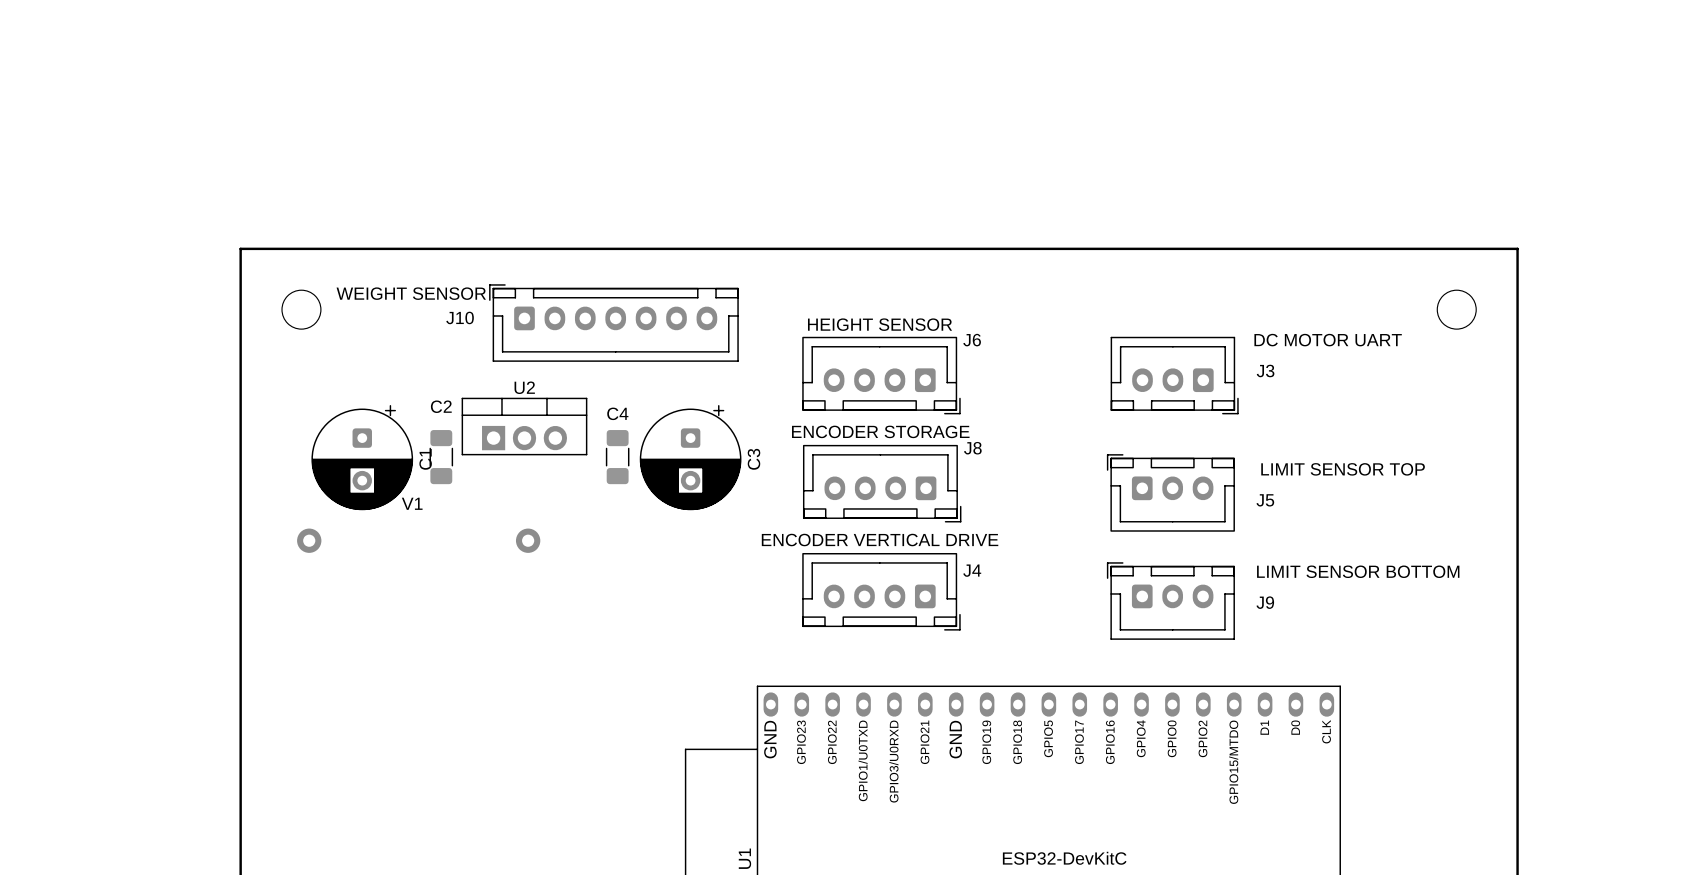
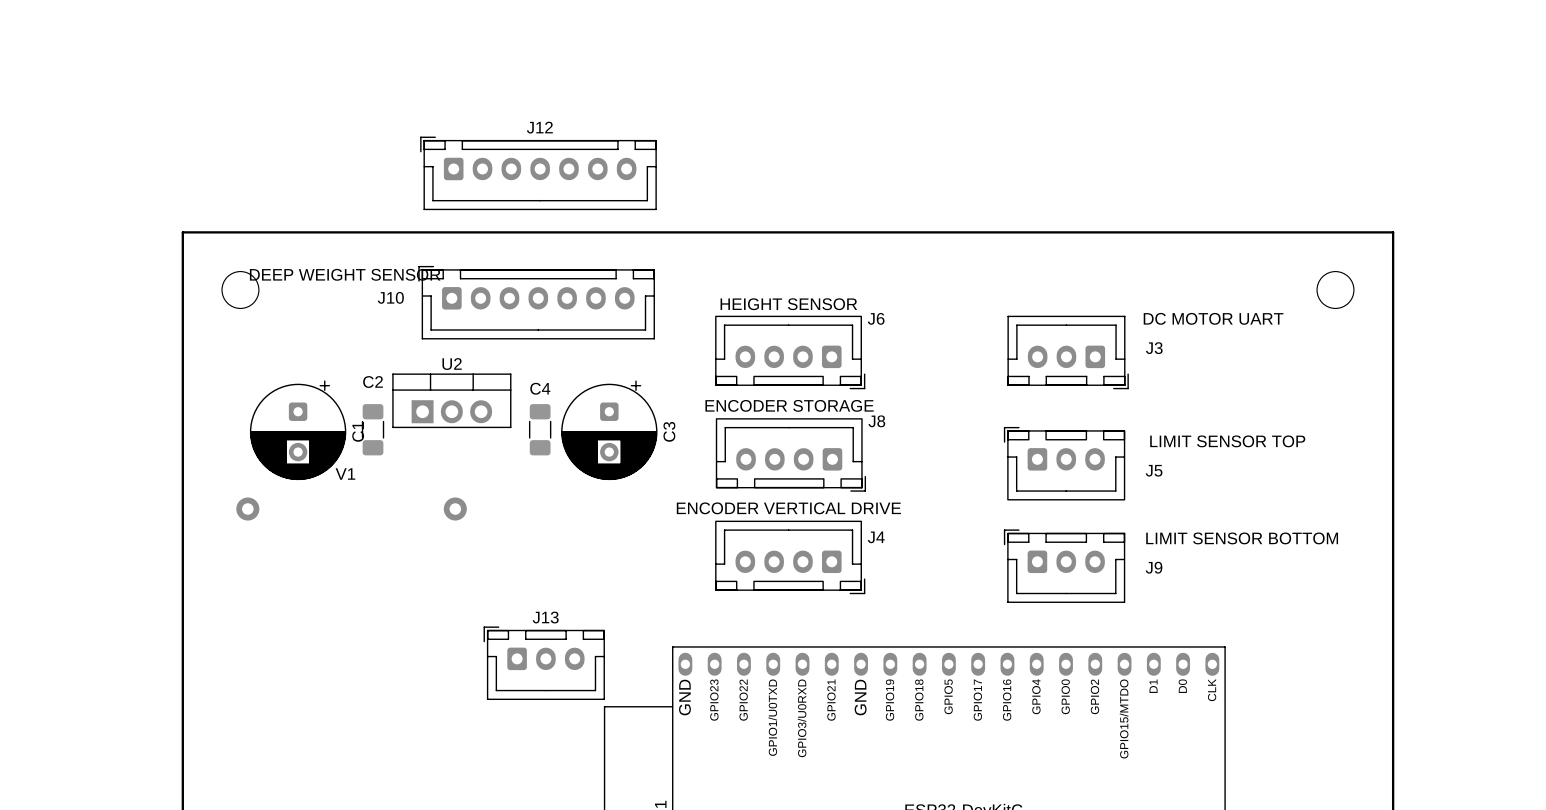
J12: none -> (538, 173)
J10 value: WEIGHT SENSOR (411, 293) -> DEEP WEIGHT SENSOR (345, 274)
J13: none -> (544, 663)

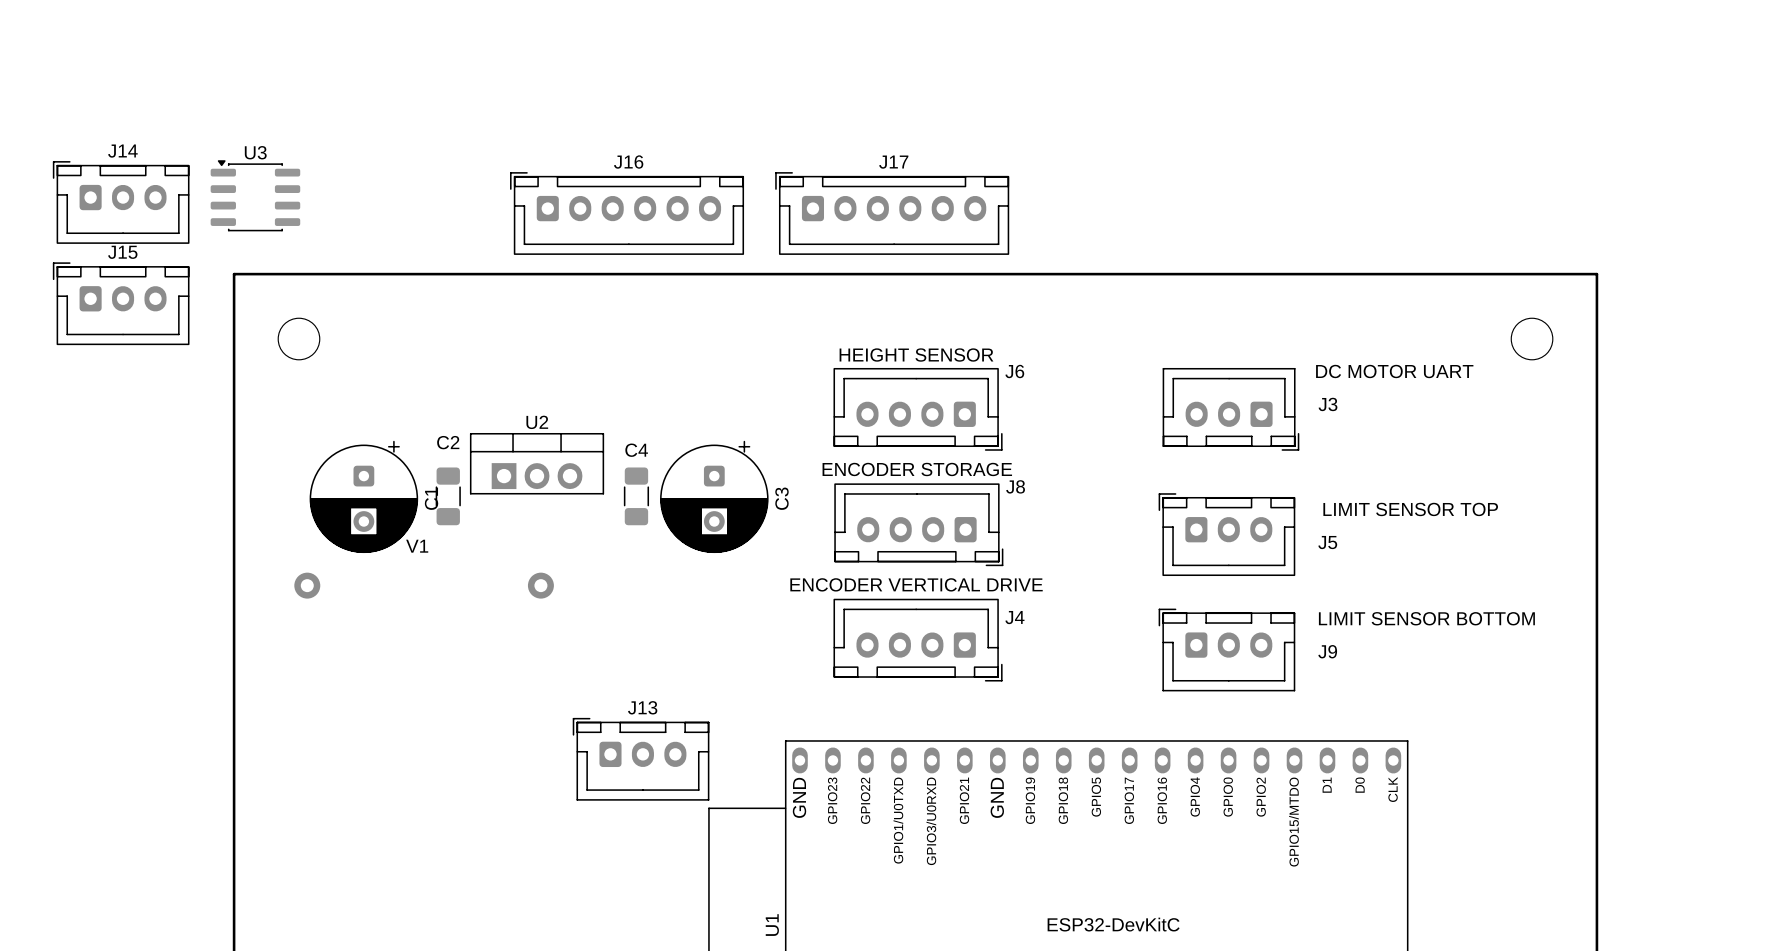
U3: none -> (255, 195)
J14: none -> (121, 202)
J12: (538, 173) -> none
J16: none -> (627, 213)
J17: none -> (892, 213)
J15: none -> (121, 303)
J10: DEEP WEIGHT SENSOR (536, 302) -> none

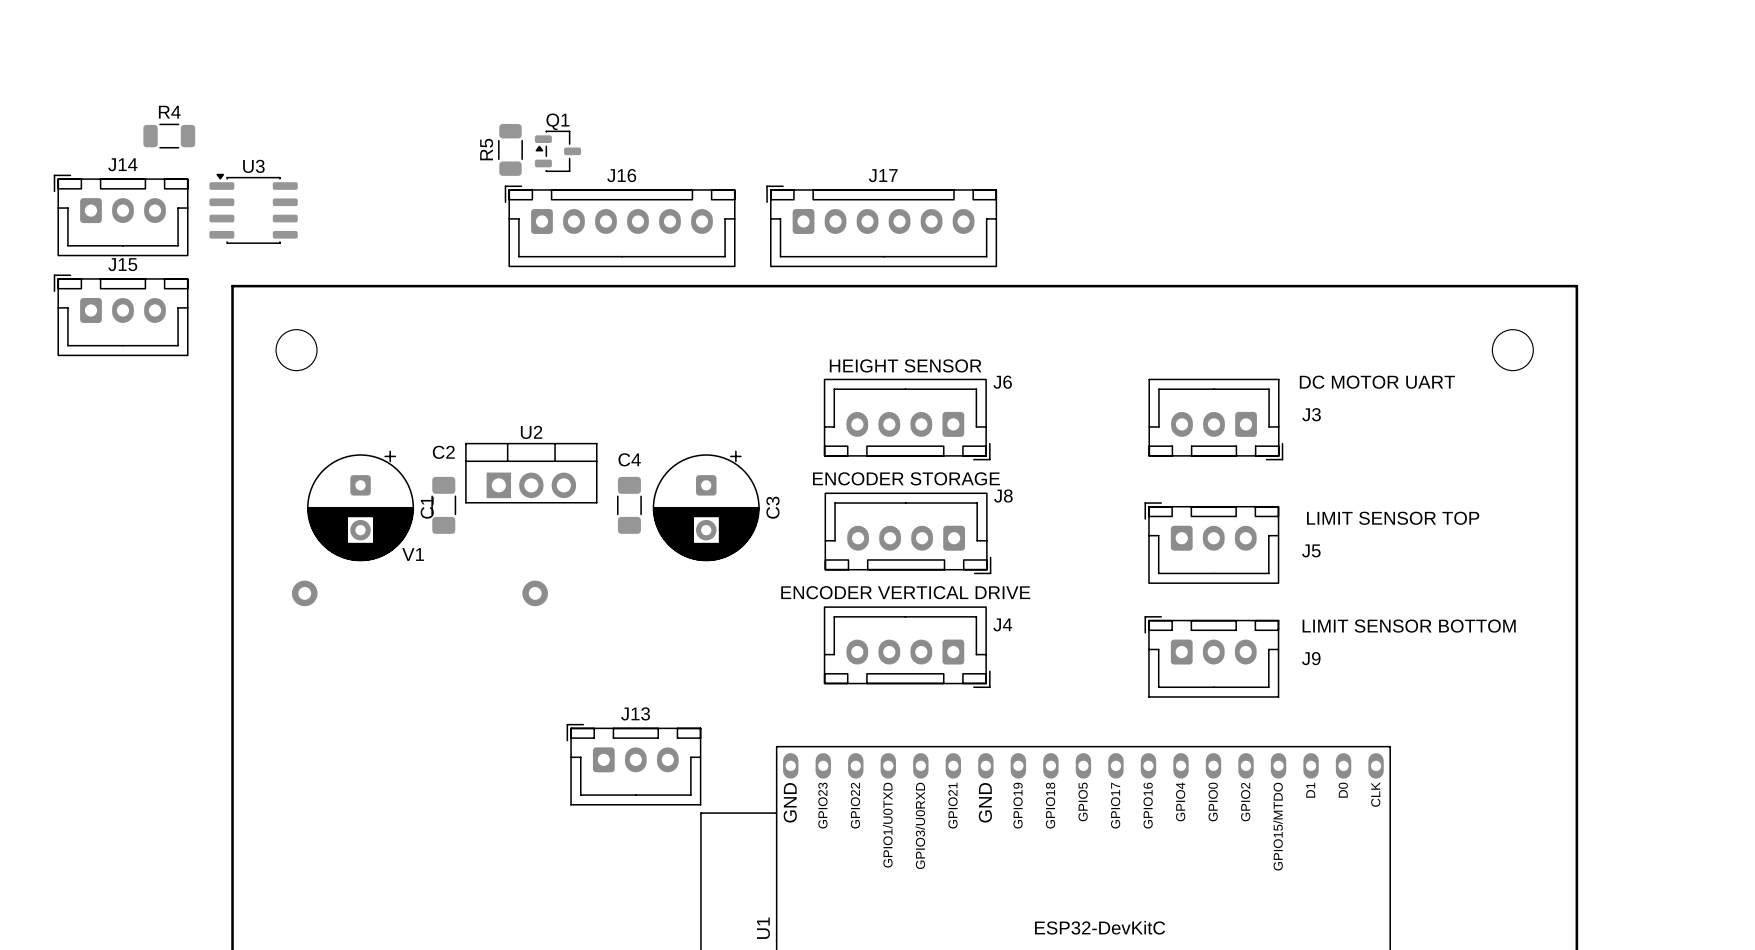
R4: none -> (169, 136)
R5: none -> (510, 149)
Q1: none -> (557, 151)

